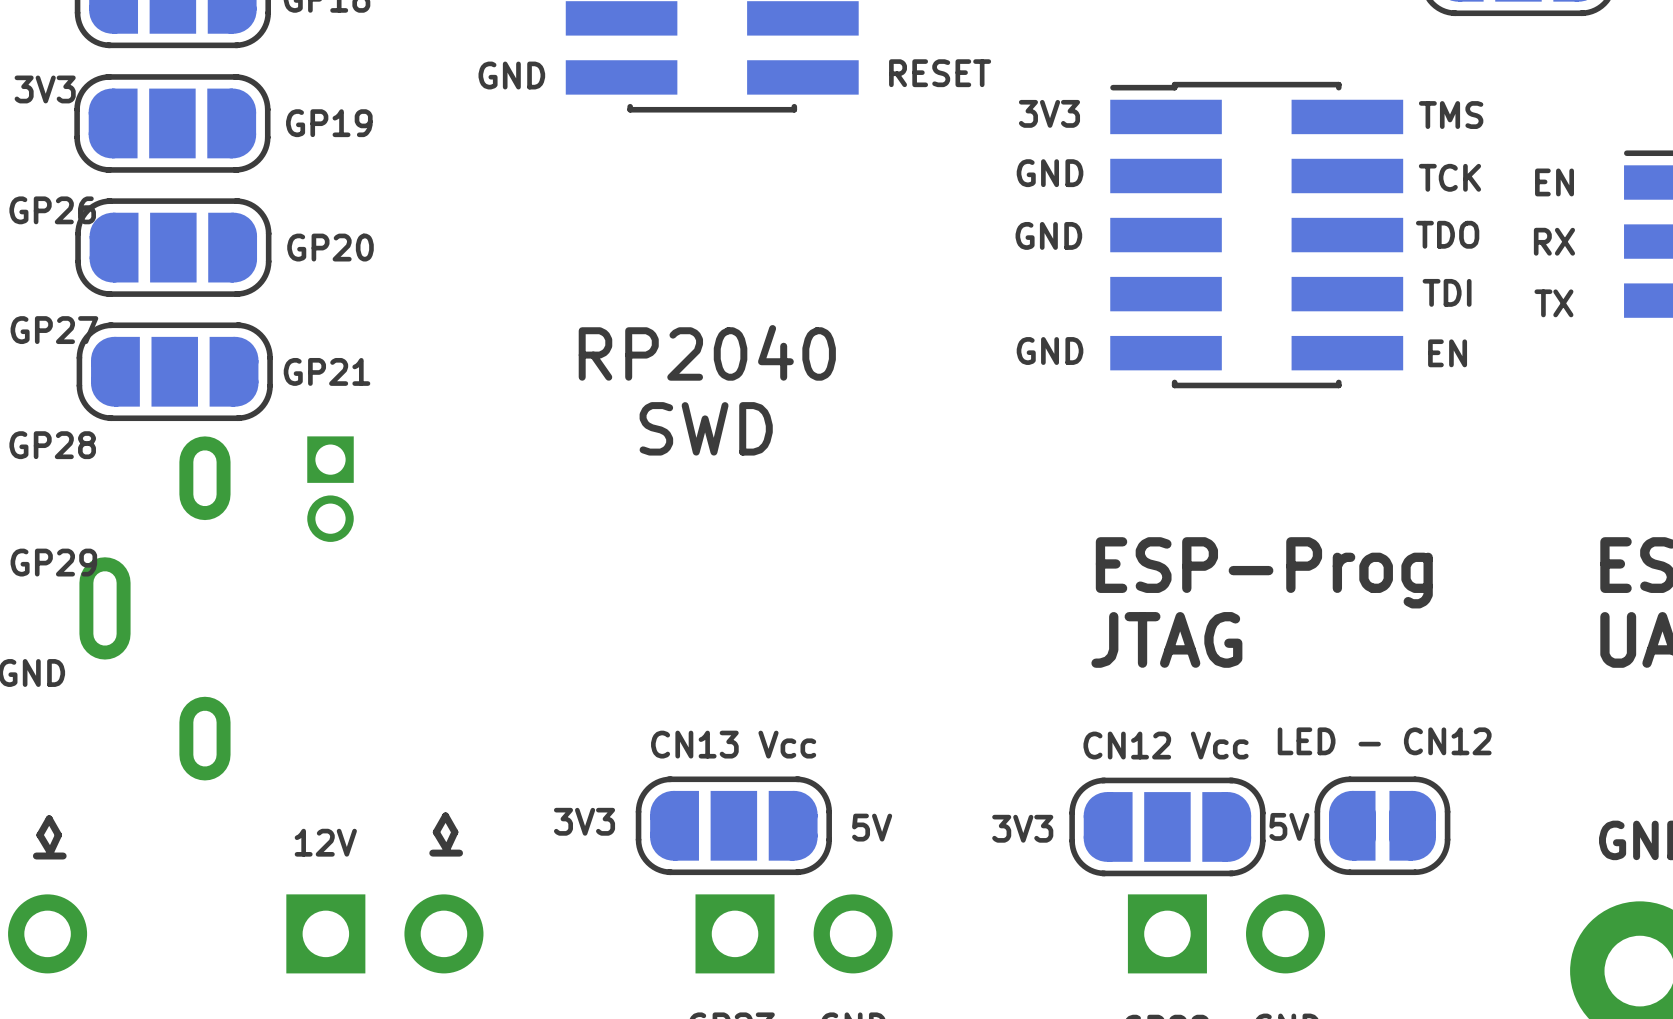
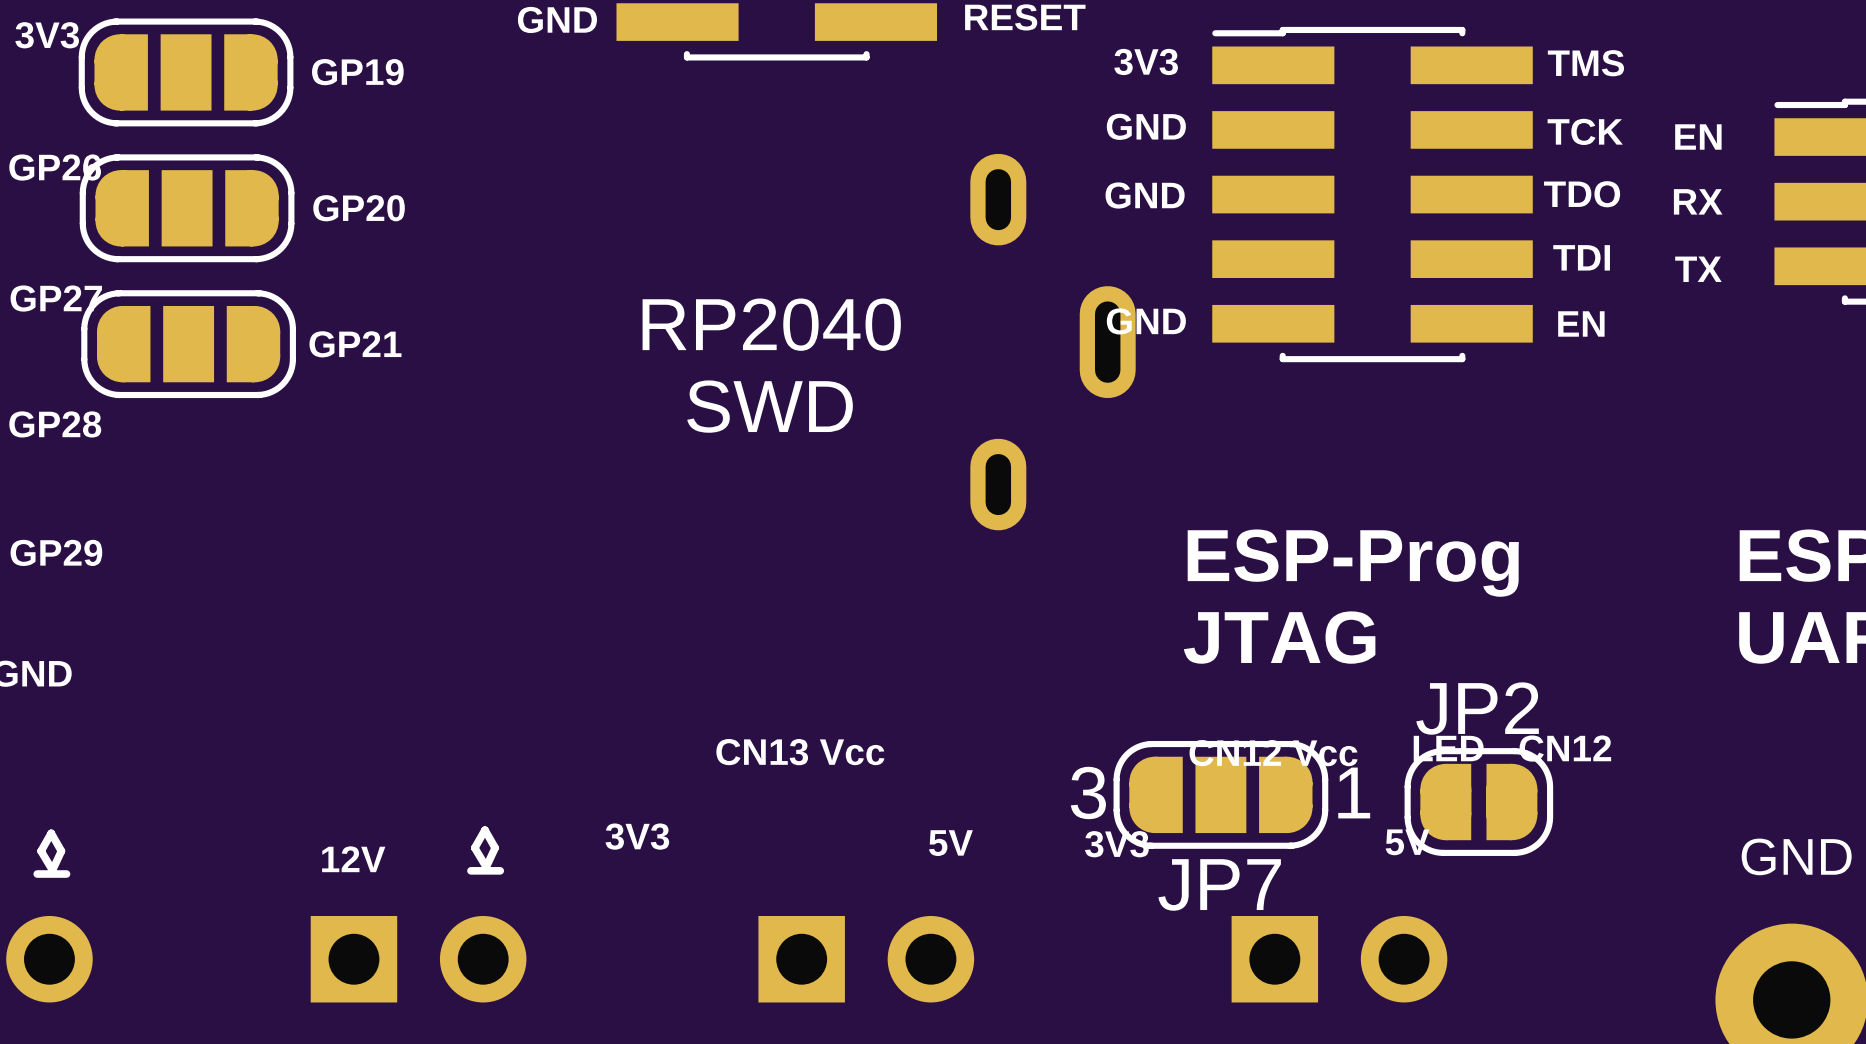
part: (330, 489) -> none
part rotation: 0° (154, 608) -> 180° (1053, 342)
part position: (154, 608) -> (1053, 342)
JP2 name: none -> JP2 (1477, 708)
JP7: none -> (1220, 794)
part: (733, 825) -> none
JP2 position: (1382, 825) -> (1478, 802)
part: (1167, 826) -> none

